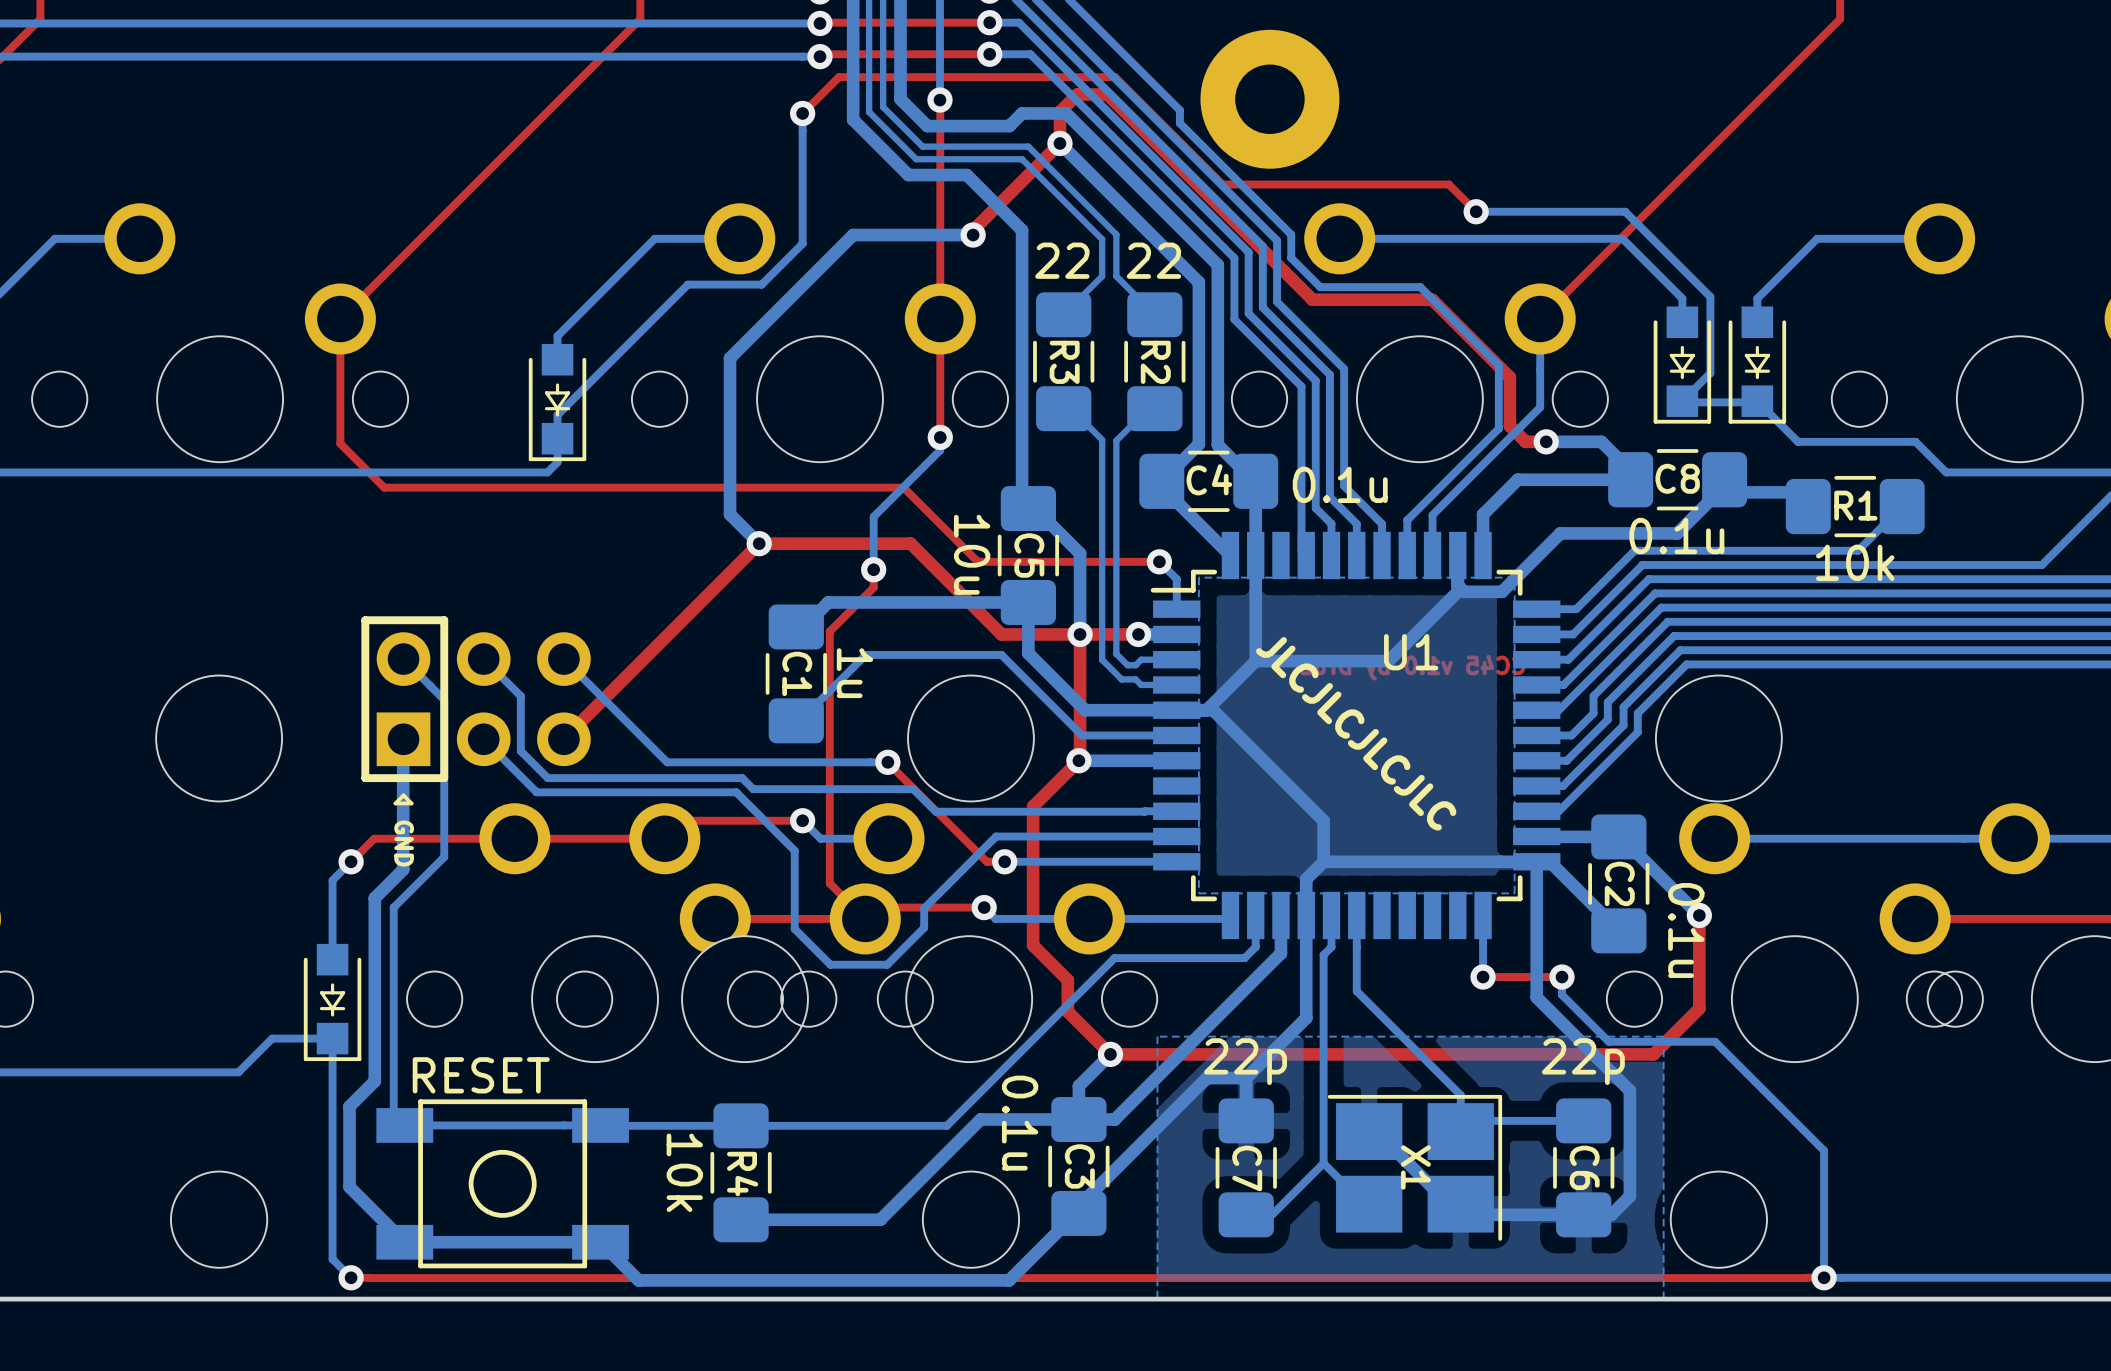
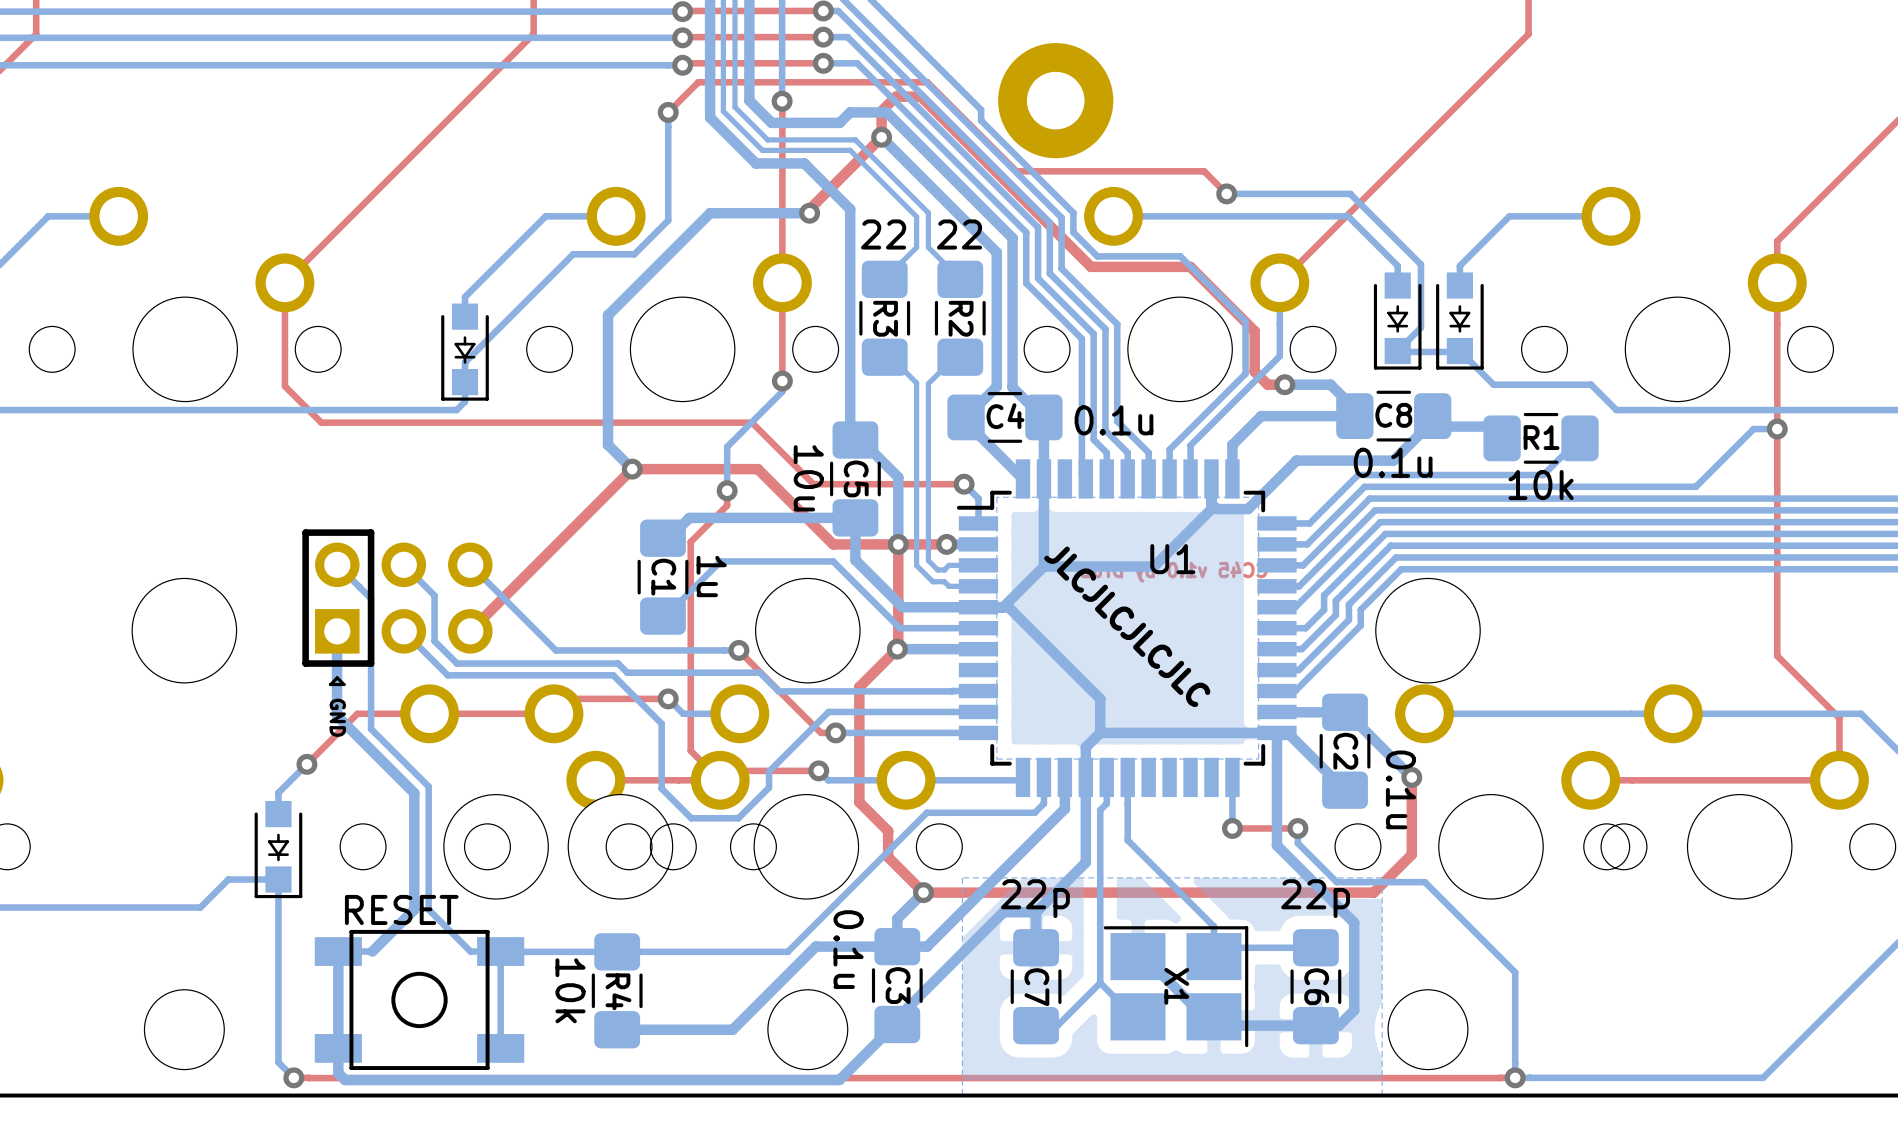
top track: (427, 838) (374, 838) (351, 861) -> (357, 713) (306, 764)
bottom track: (403, 841) (403, 869) (374, 898) (374, 1081) (349, 1106) (349, 1187) (404, 1242) (600, 1242) (638, 1280) -> (337, 715) (414, 793) (414, 909) (372, 951)
bottom track: (444, 857) (393, 907) (393, 1114) (404, 1125) -> (371, 728) (428, 786) (428, 909) (470, 951)
bottom track: (351, 861) (332, 880) (332, 934) -> (306, 764) (278, 792)
via position: (351, 861) -> (306, 764)
bottom track: none -> (338, 951) (338, 1073) (345, 1080) (532, 1080)
bottom track: (564, 1125) (445, 1125) -> none
bottom track: none -> (500, 951) (500, 1048)

